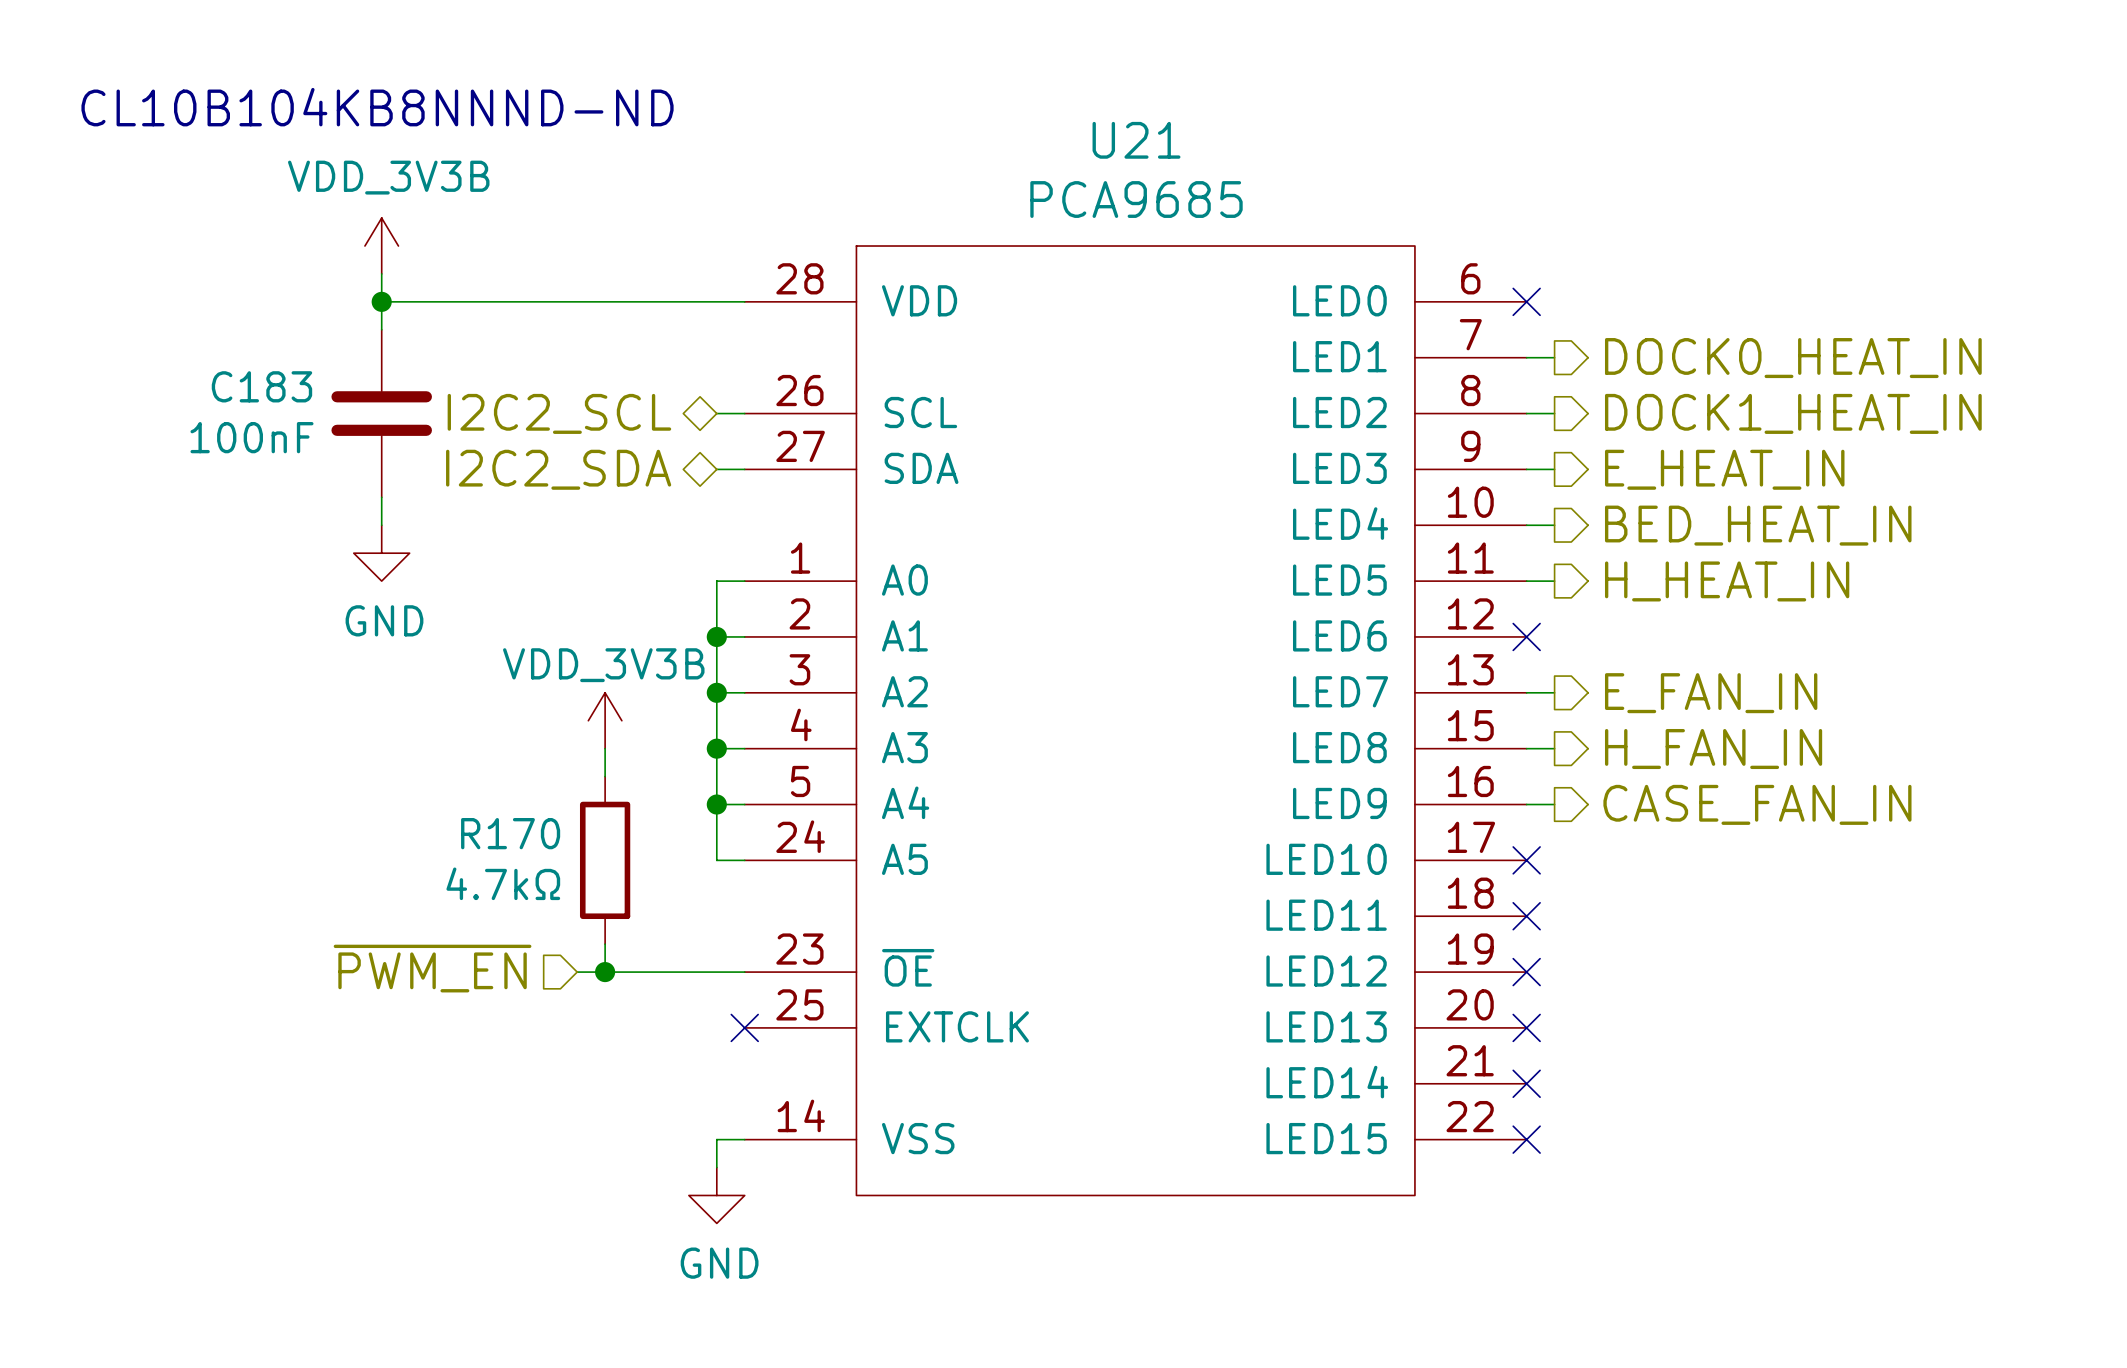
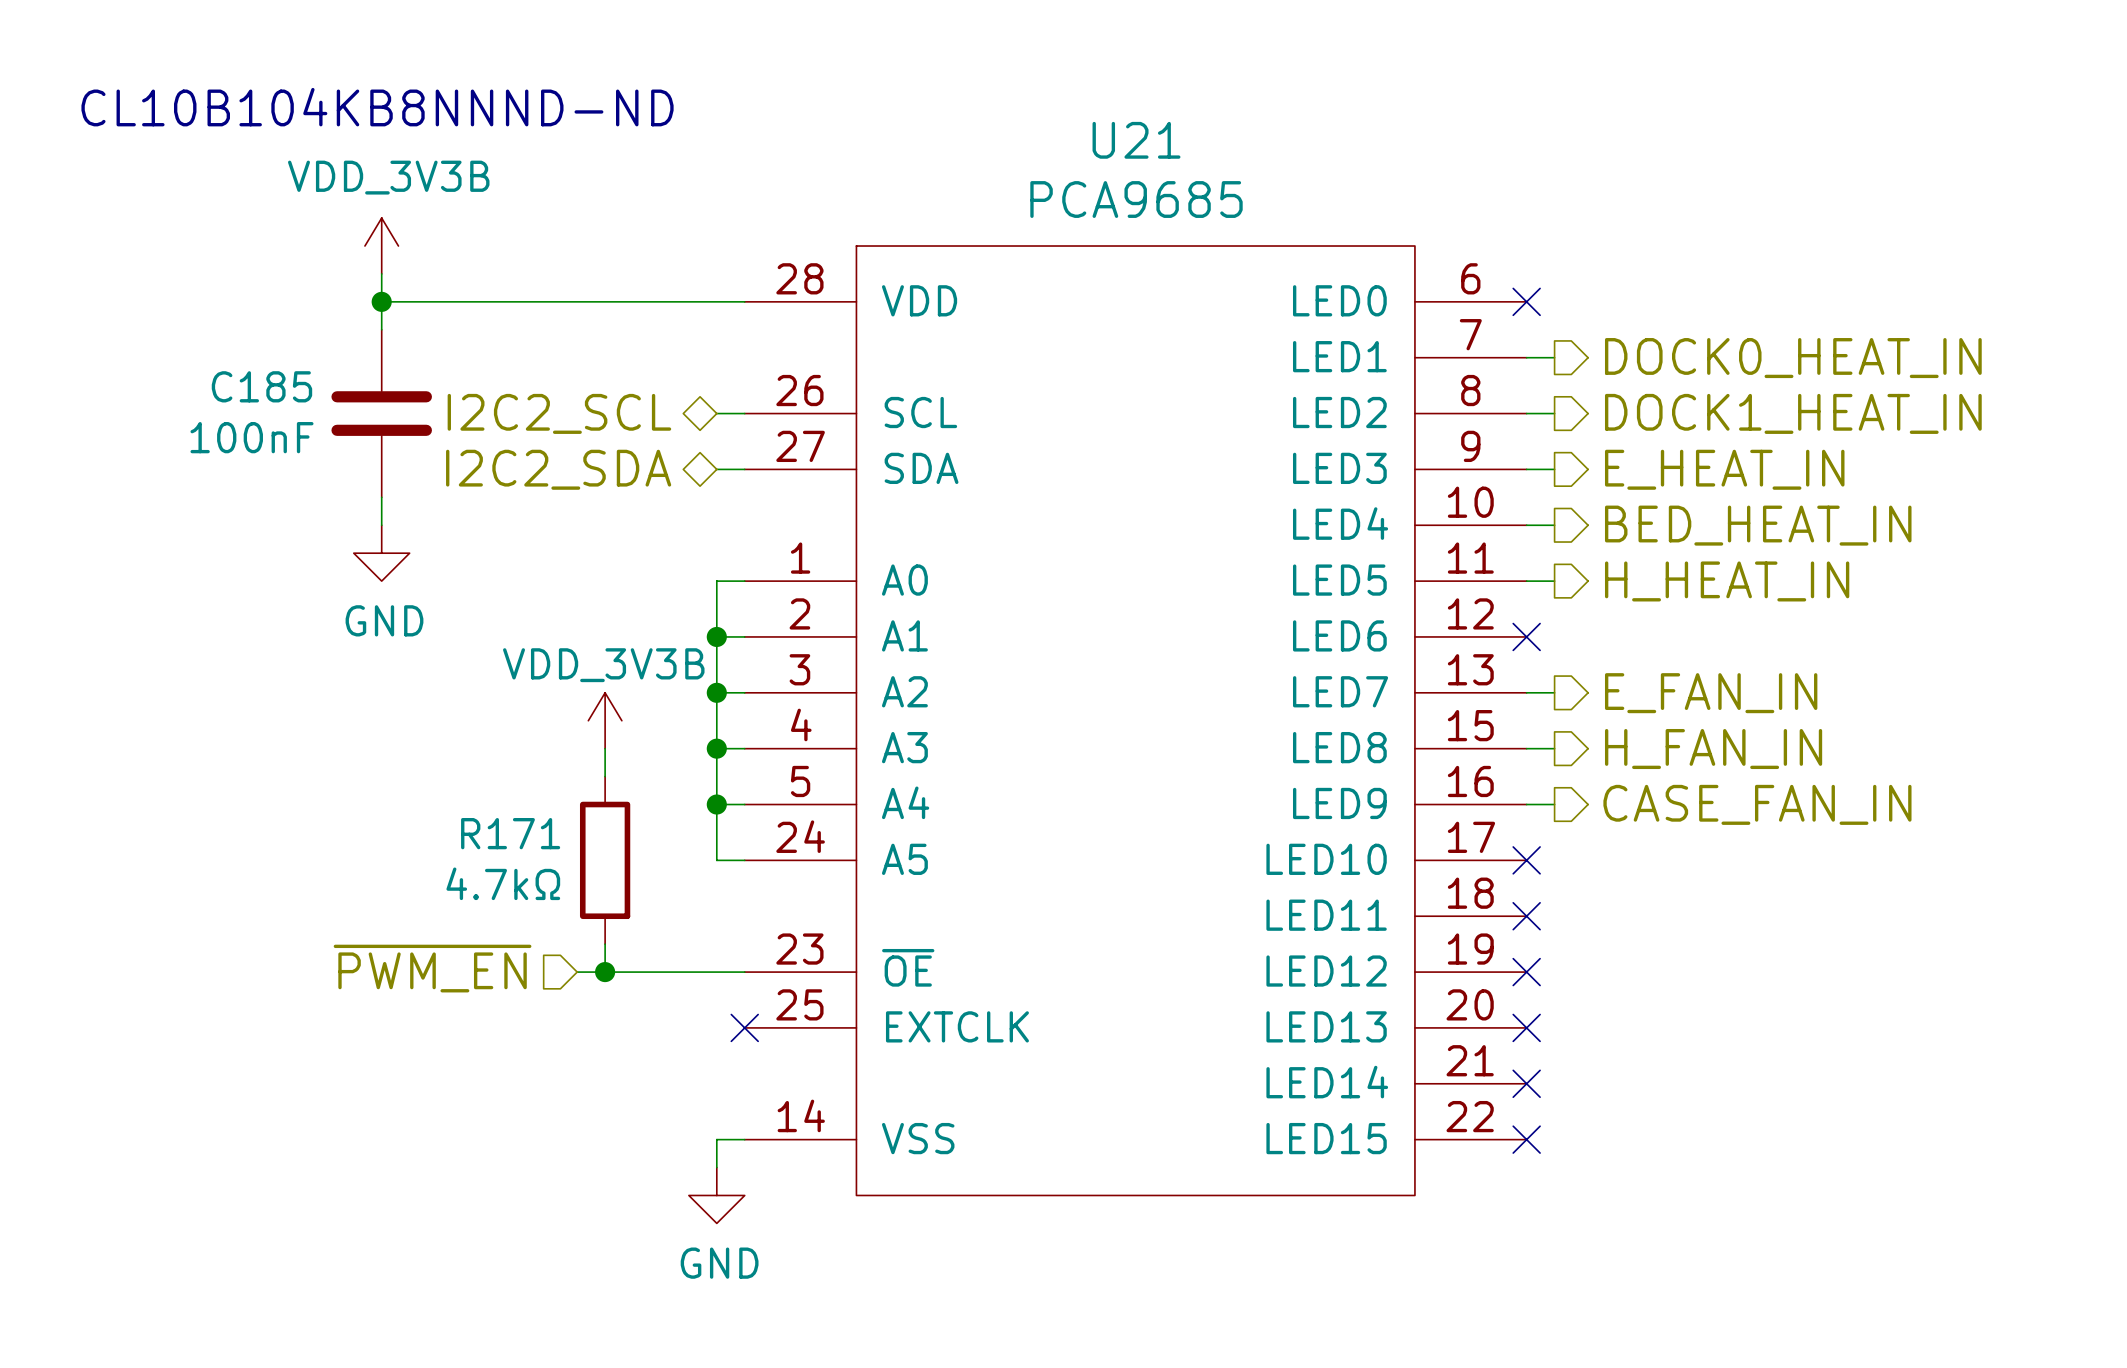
C183 name: C183 (261, 386) -> C185 (261, 386)
R170 name: R170 (510, 833) -> R171 (510, 833)

